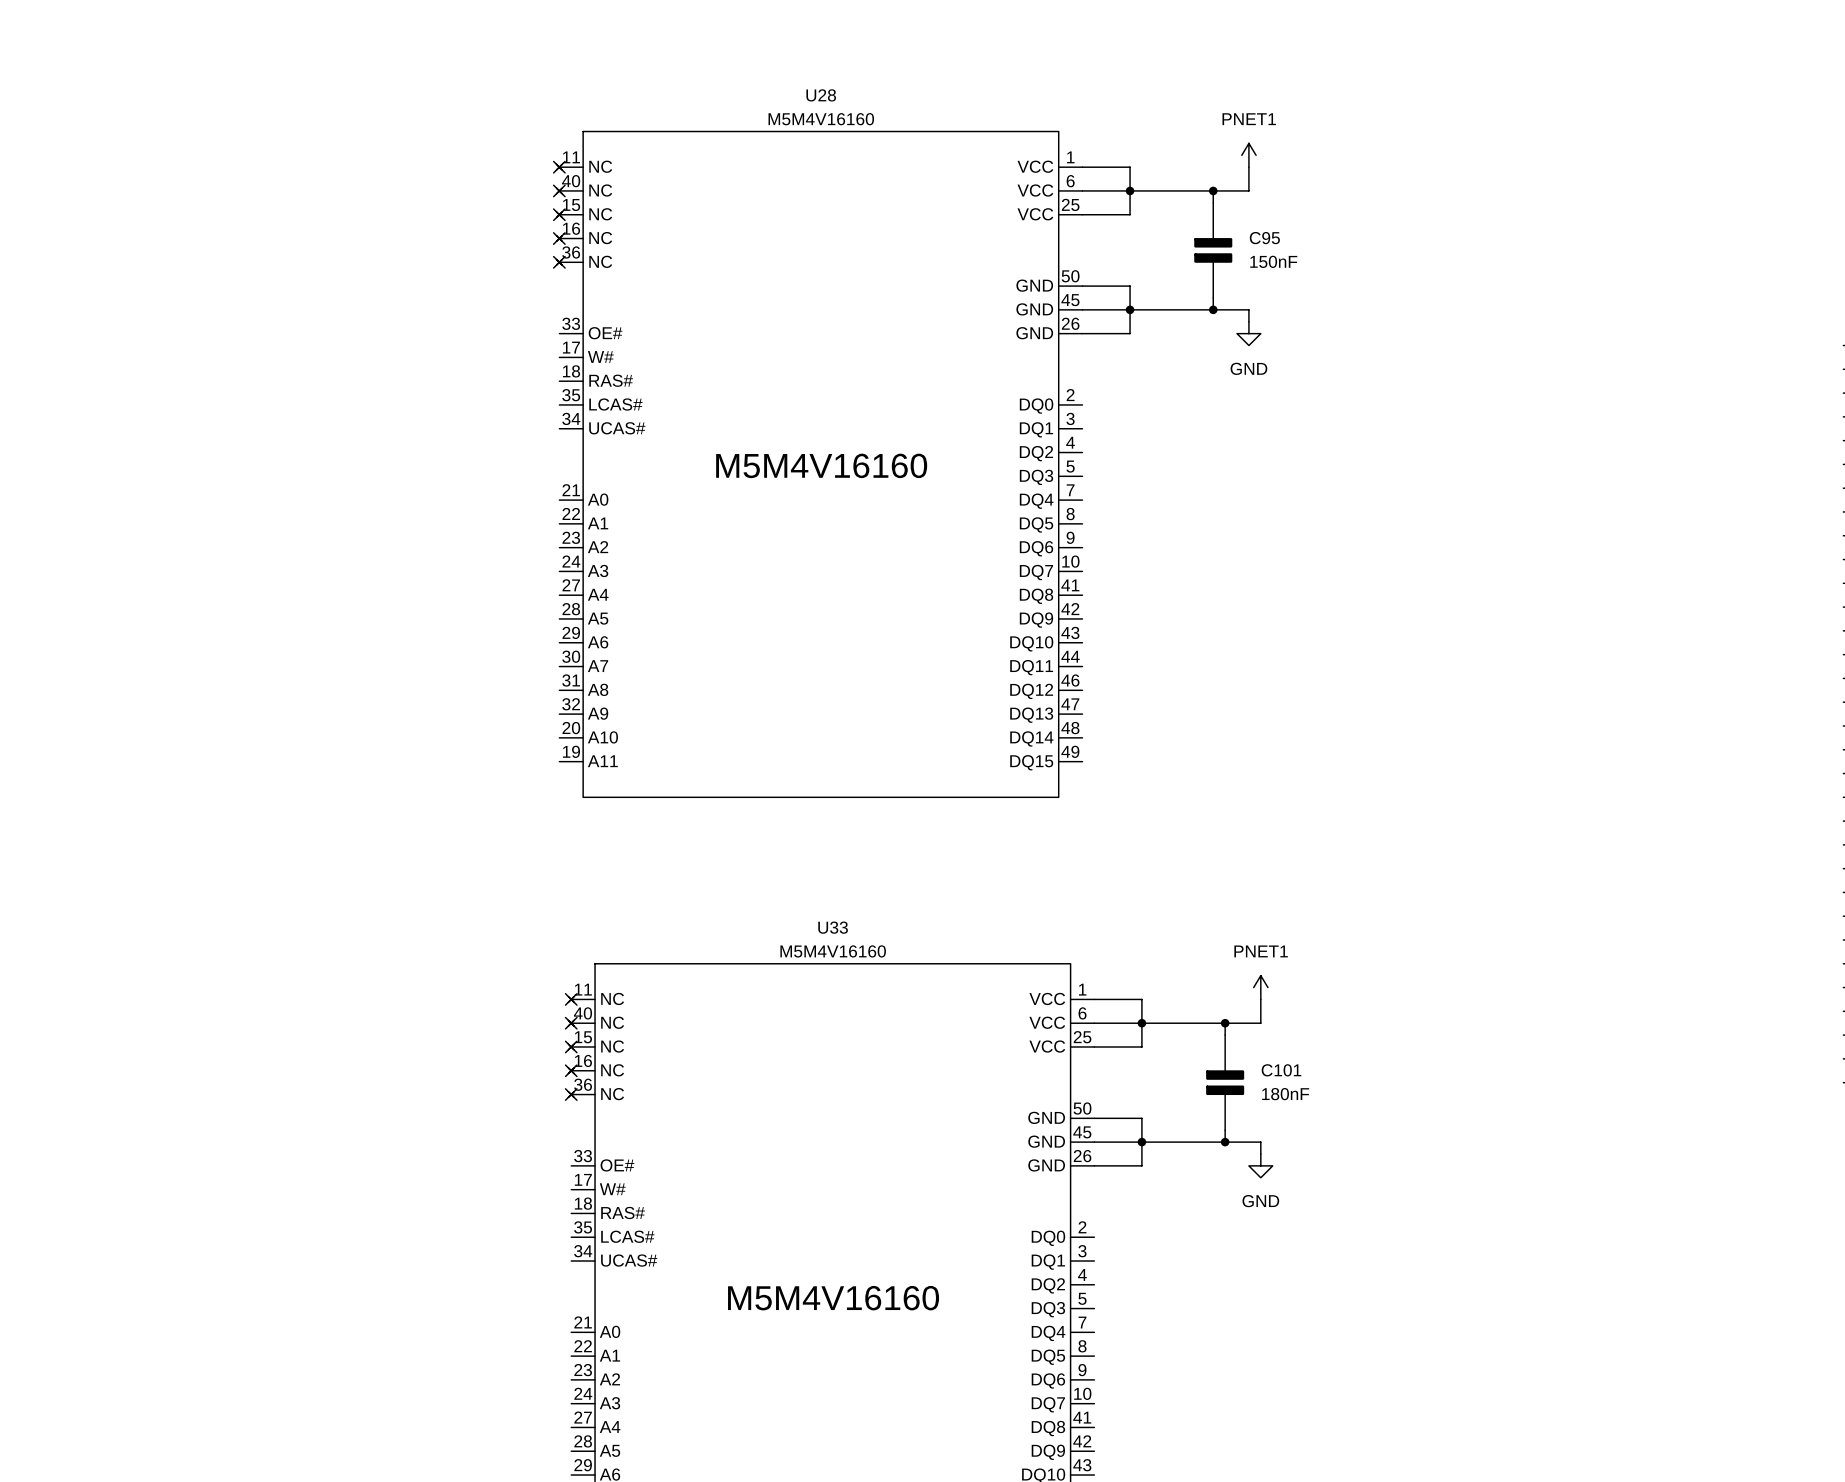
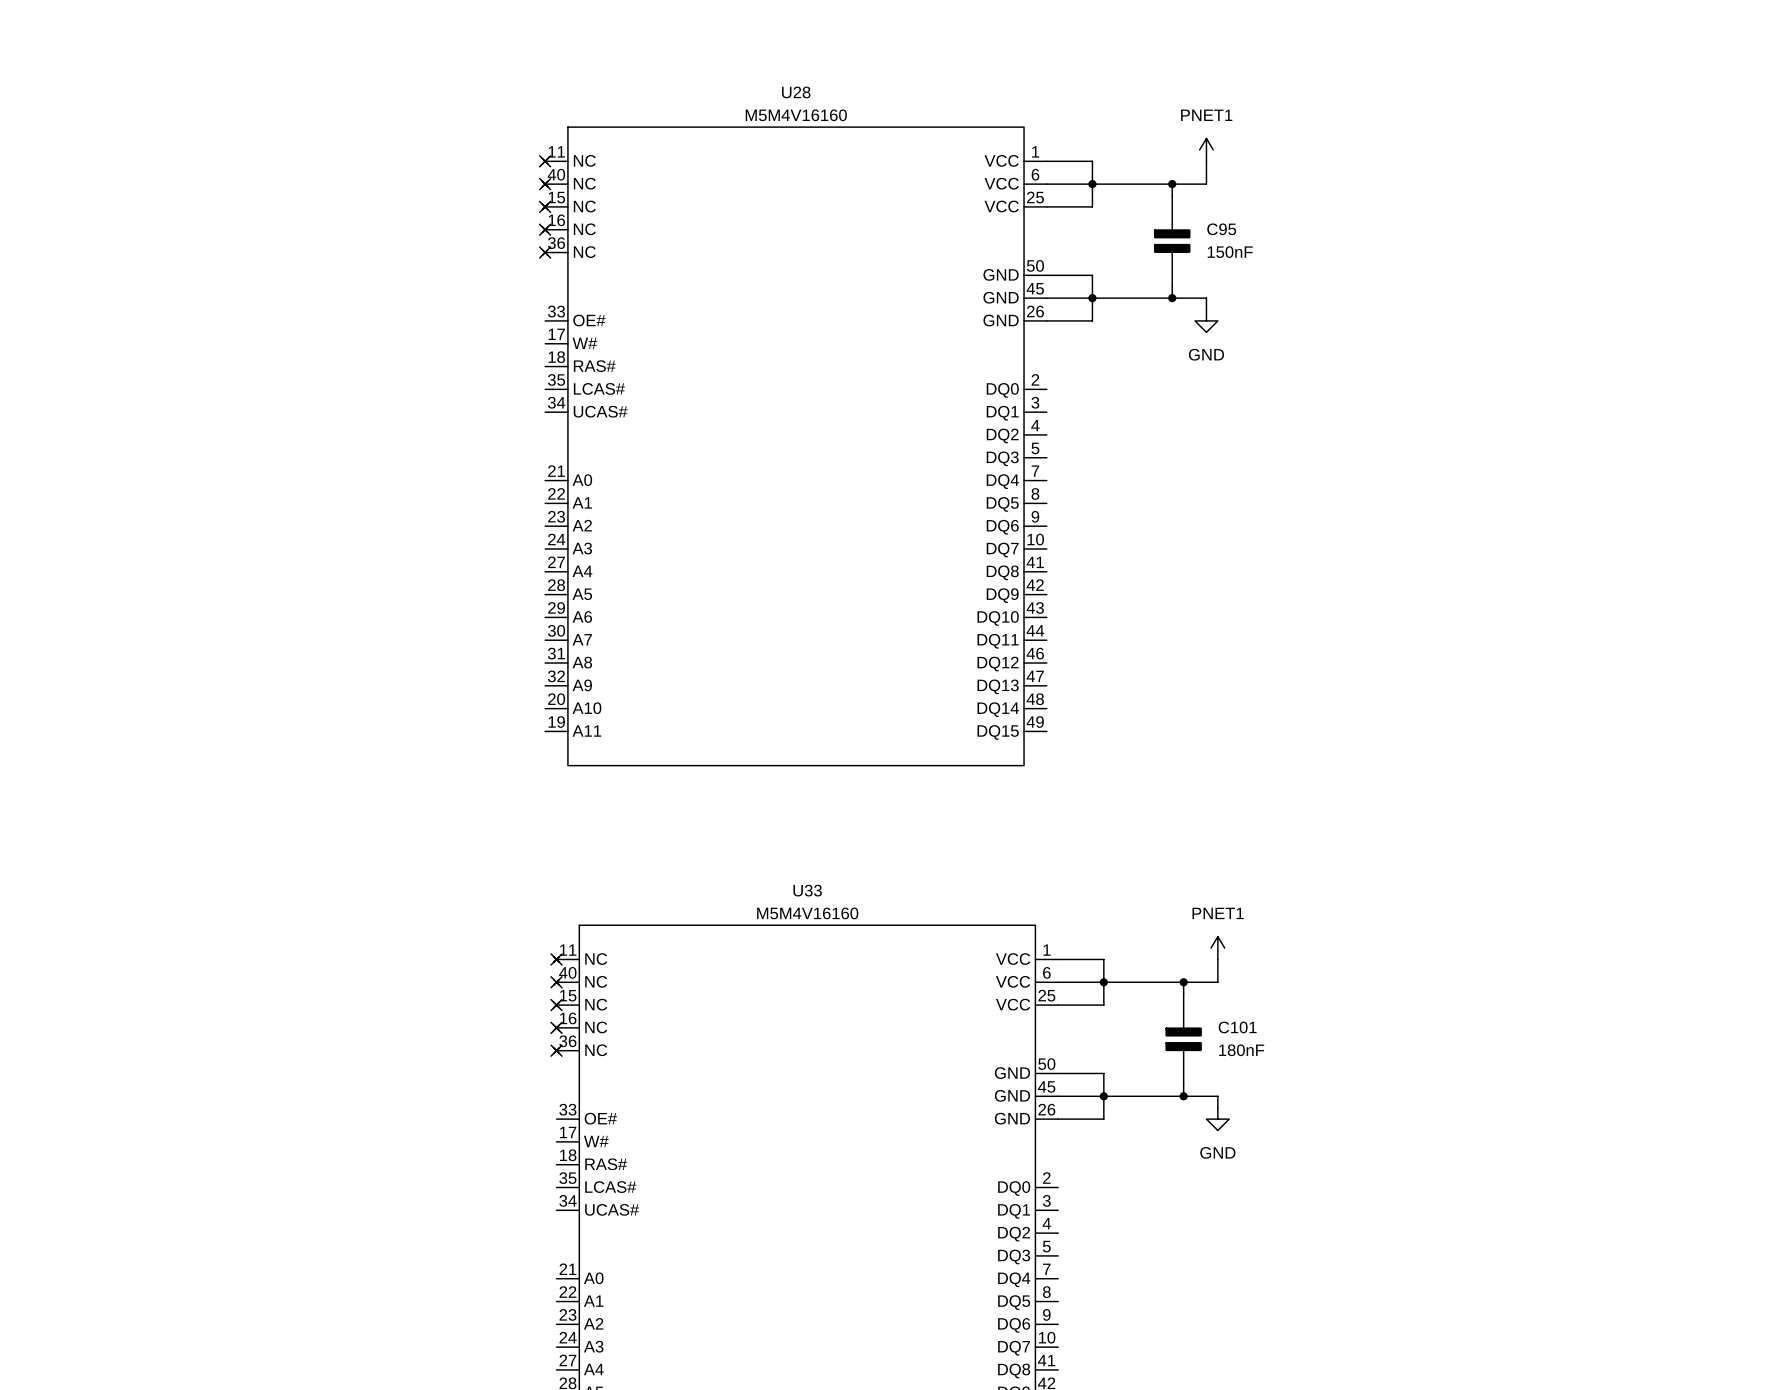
U28 text: M5M4V16160 (821, 465) -> none
U33 text: M5M4V16160 (833, 1298) -> none

